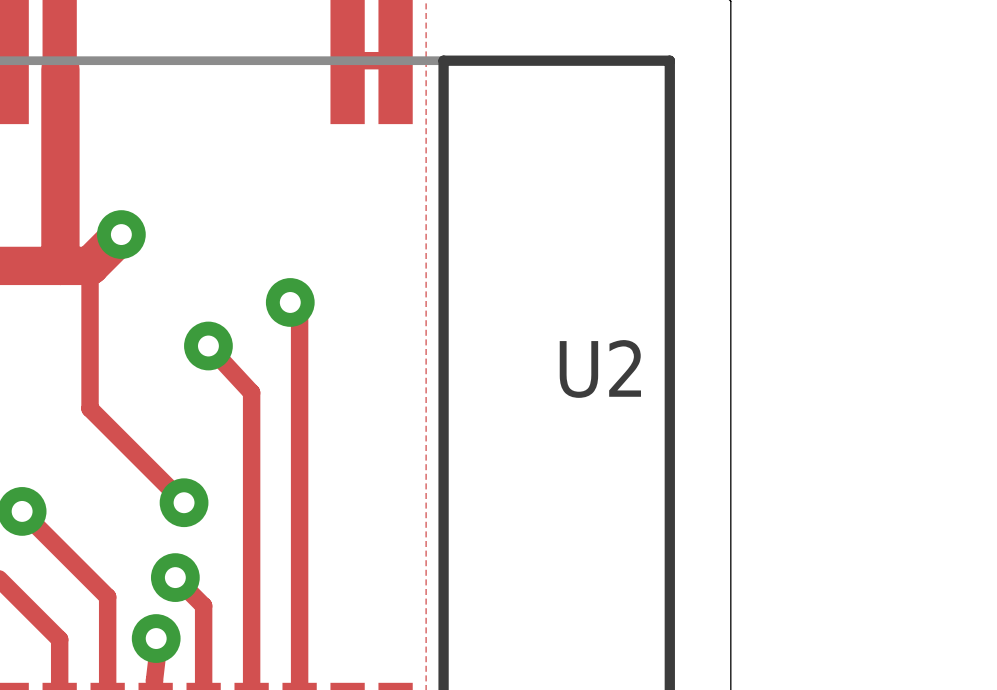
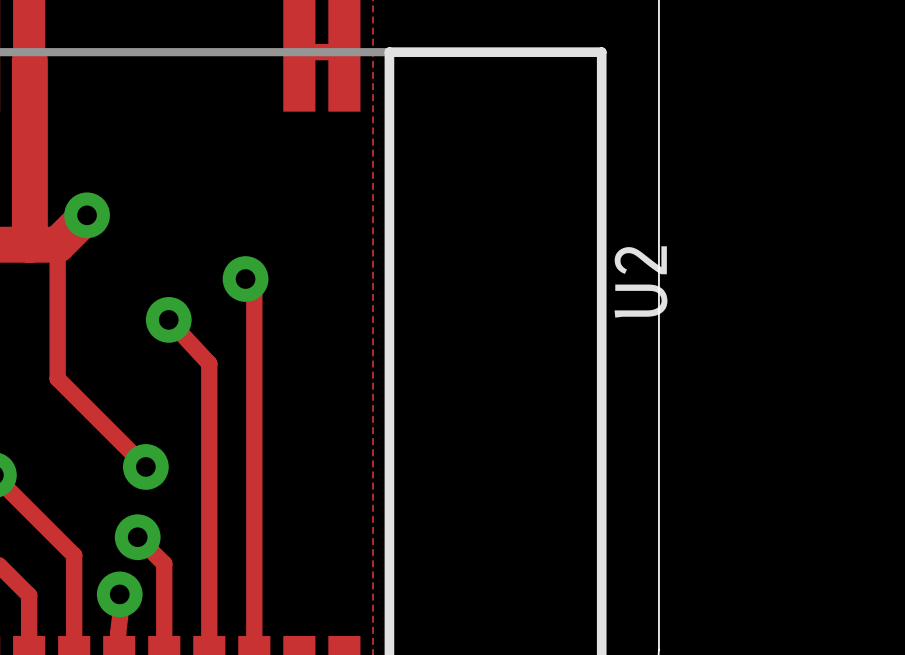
U2 name rotation: 0° (600, 368) -> 90° counterclockwise (641, 281)

